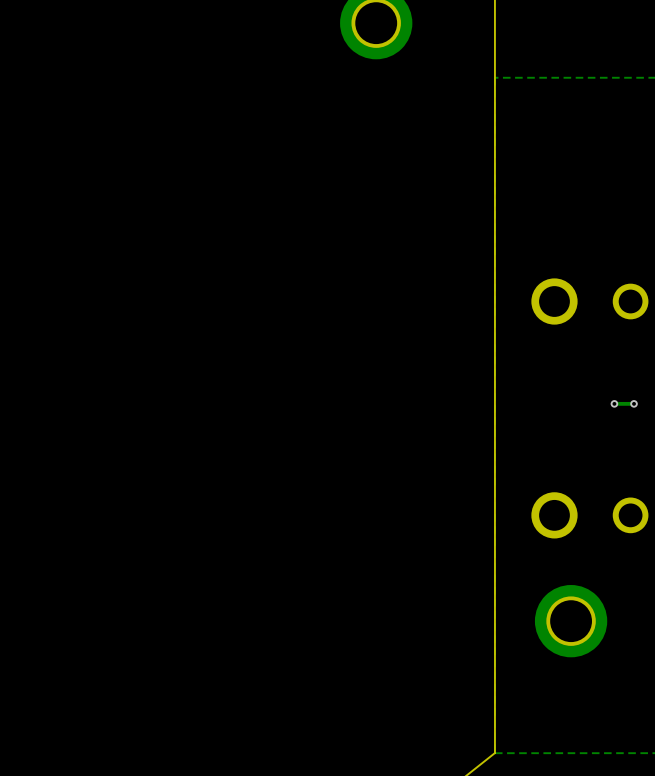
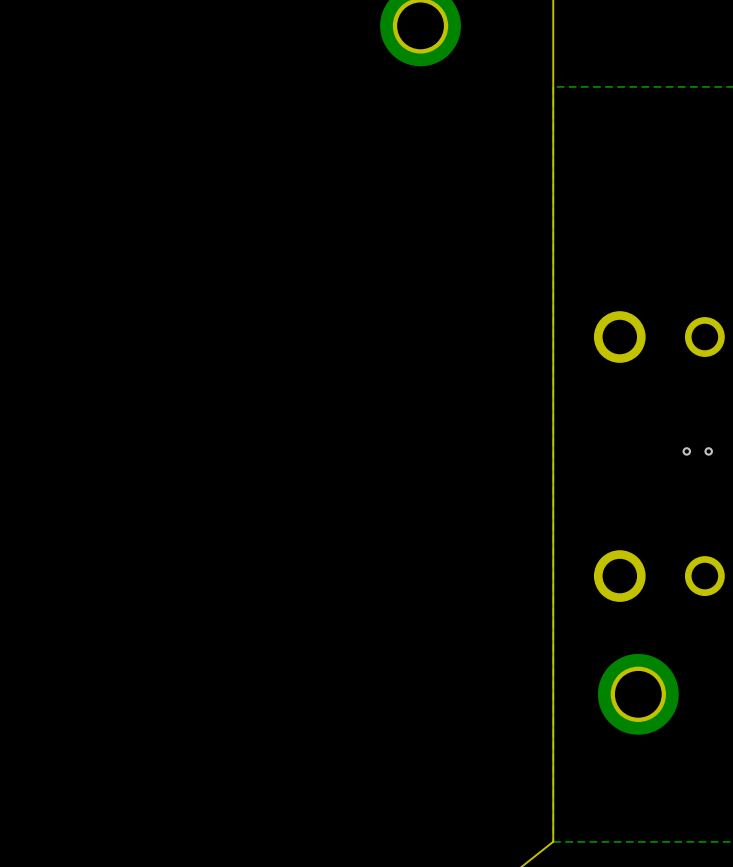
track: (634, 403) (614, 403) -> none

